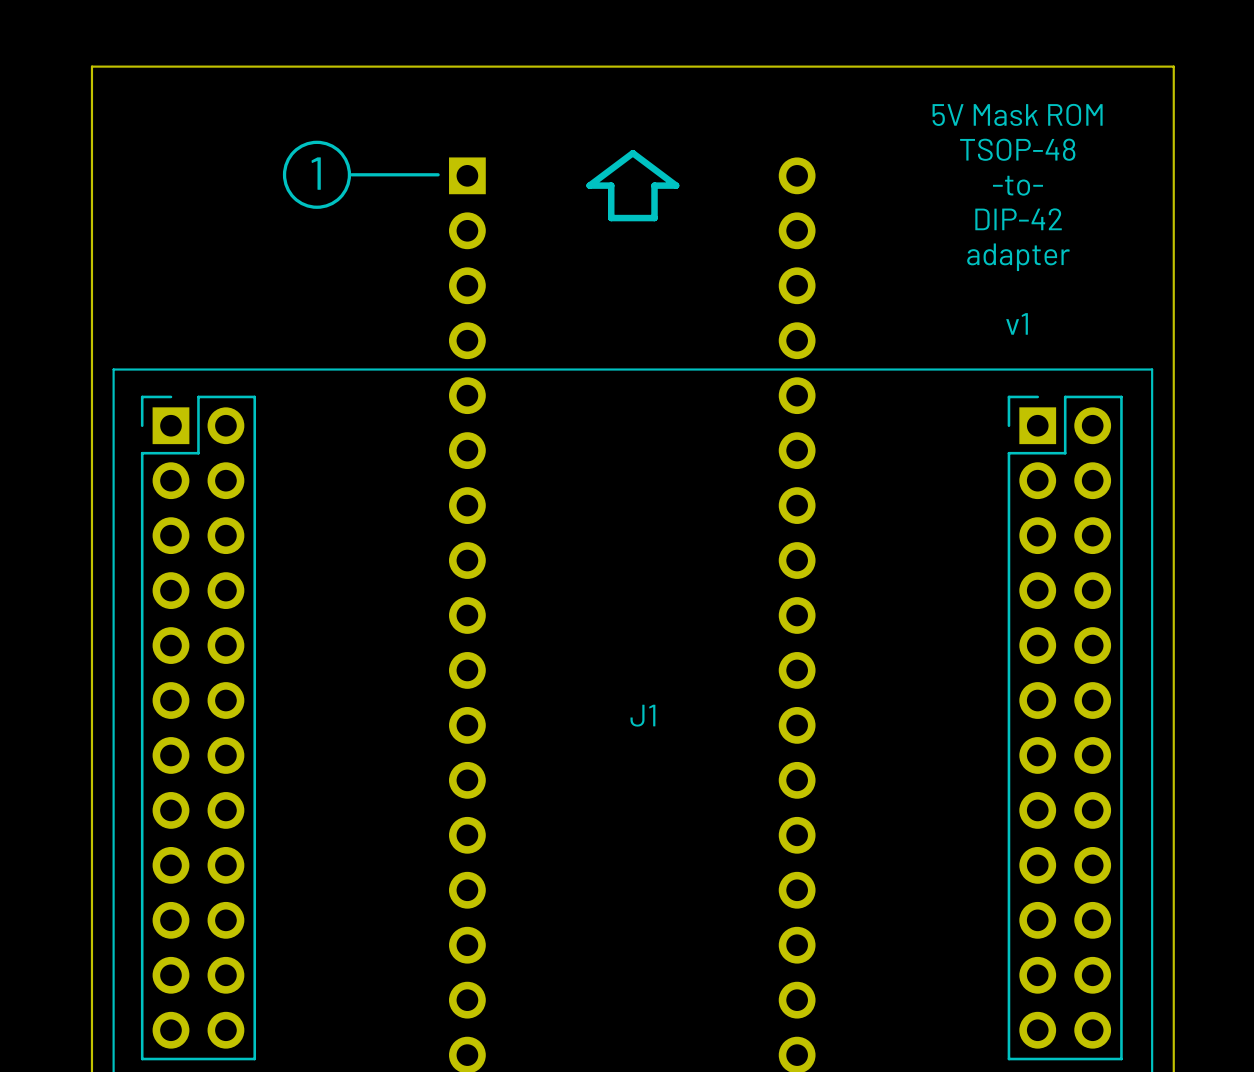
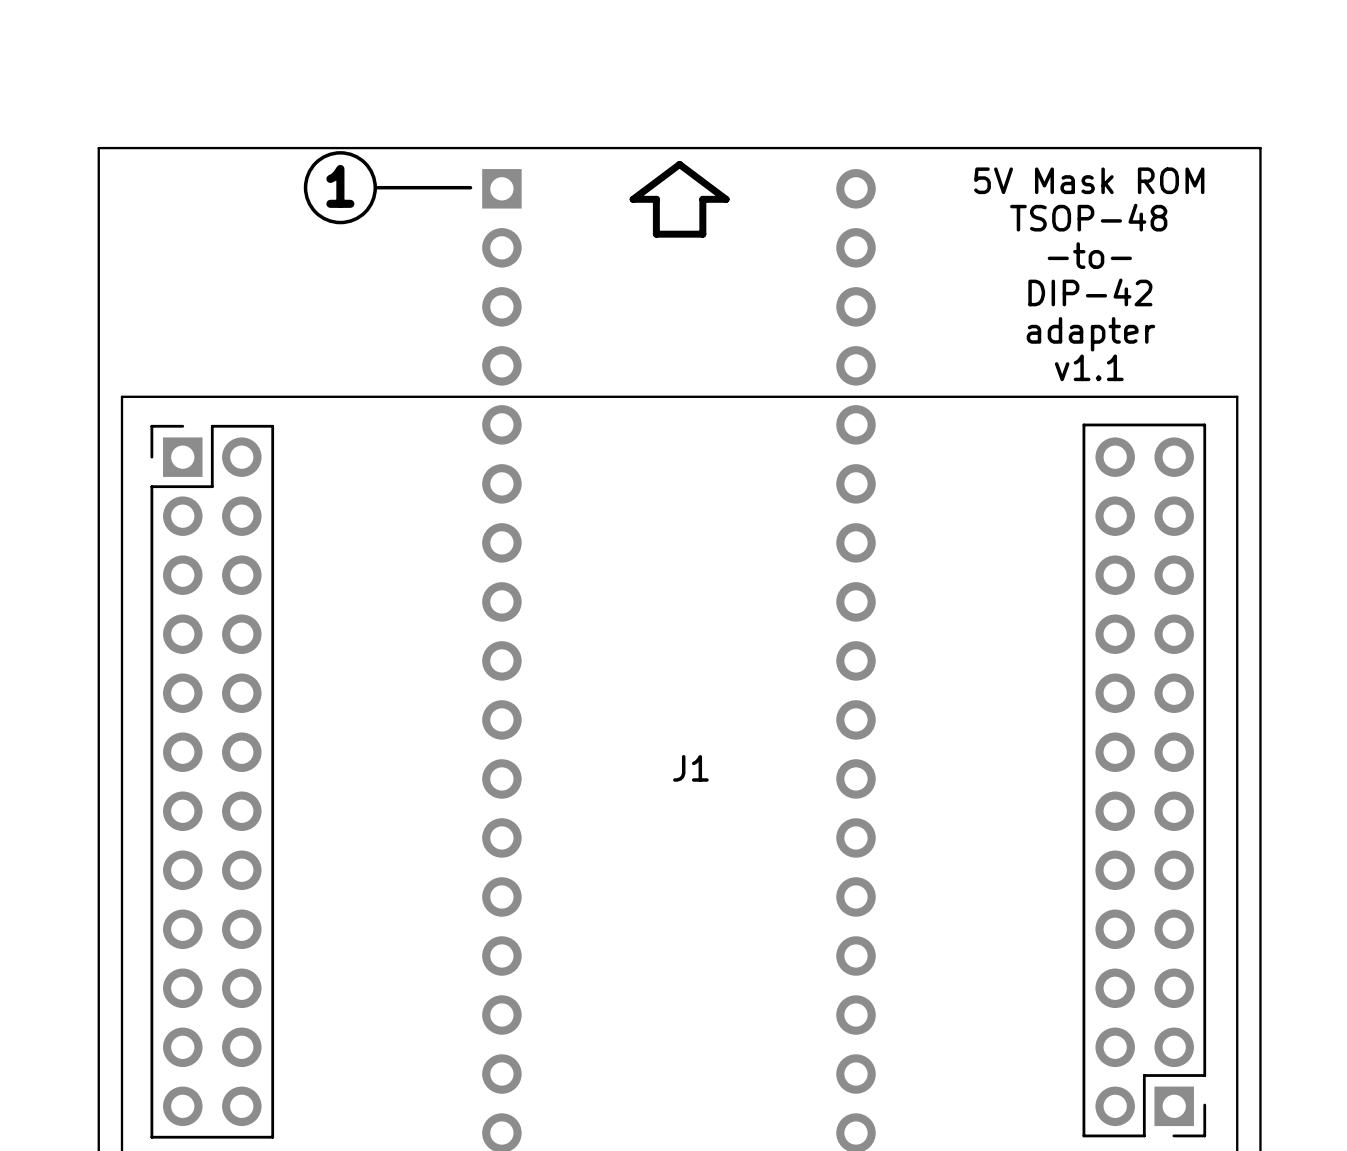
text position: 5V Mask ROM (1017, 114) -> 5V Mask ROM (1089, 180)
board edge: (91, 137) (91, 66) (1173, 66) (1173, 137) -> (98, 148) (1260, 148)
text position: TSOP-48 (1017, 149) -> TSOP-48 (1088, 217)
text position: -to- (1018, 185) -> -to- (1089, 255)
text position: DIP-42 (1018, 219) -> DIP-42 (1090, 292)
text position: adapter (1018, 257) -> adapter (1090, 334)
text: v1 (1017, 323) -> v1.1 (1089, 367)
J1 footprint: [140, 395, 1123, 1061] -> [150, 423, 1207, 1139]

